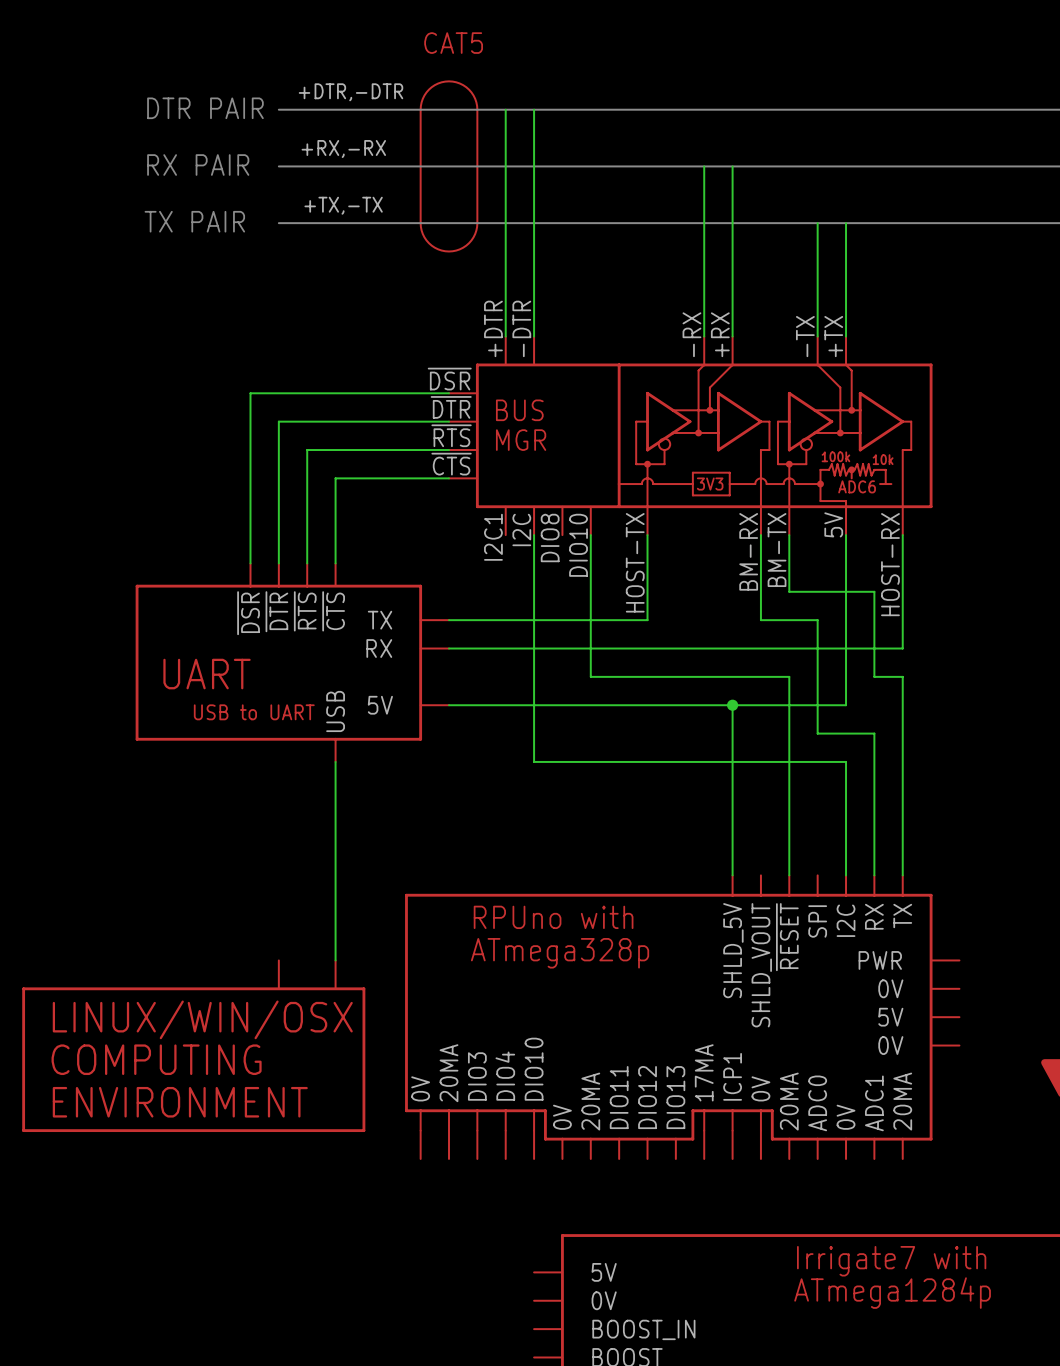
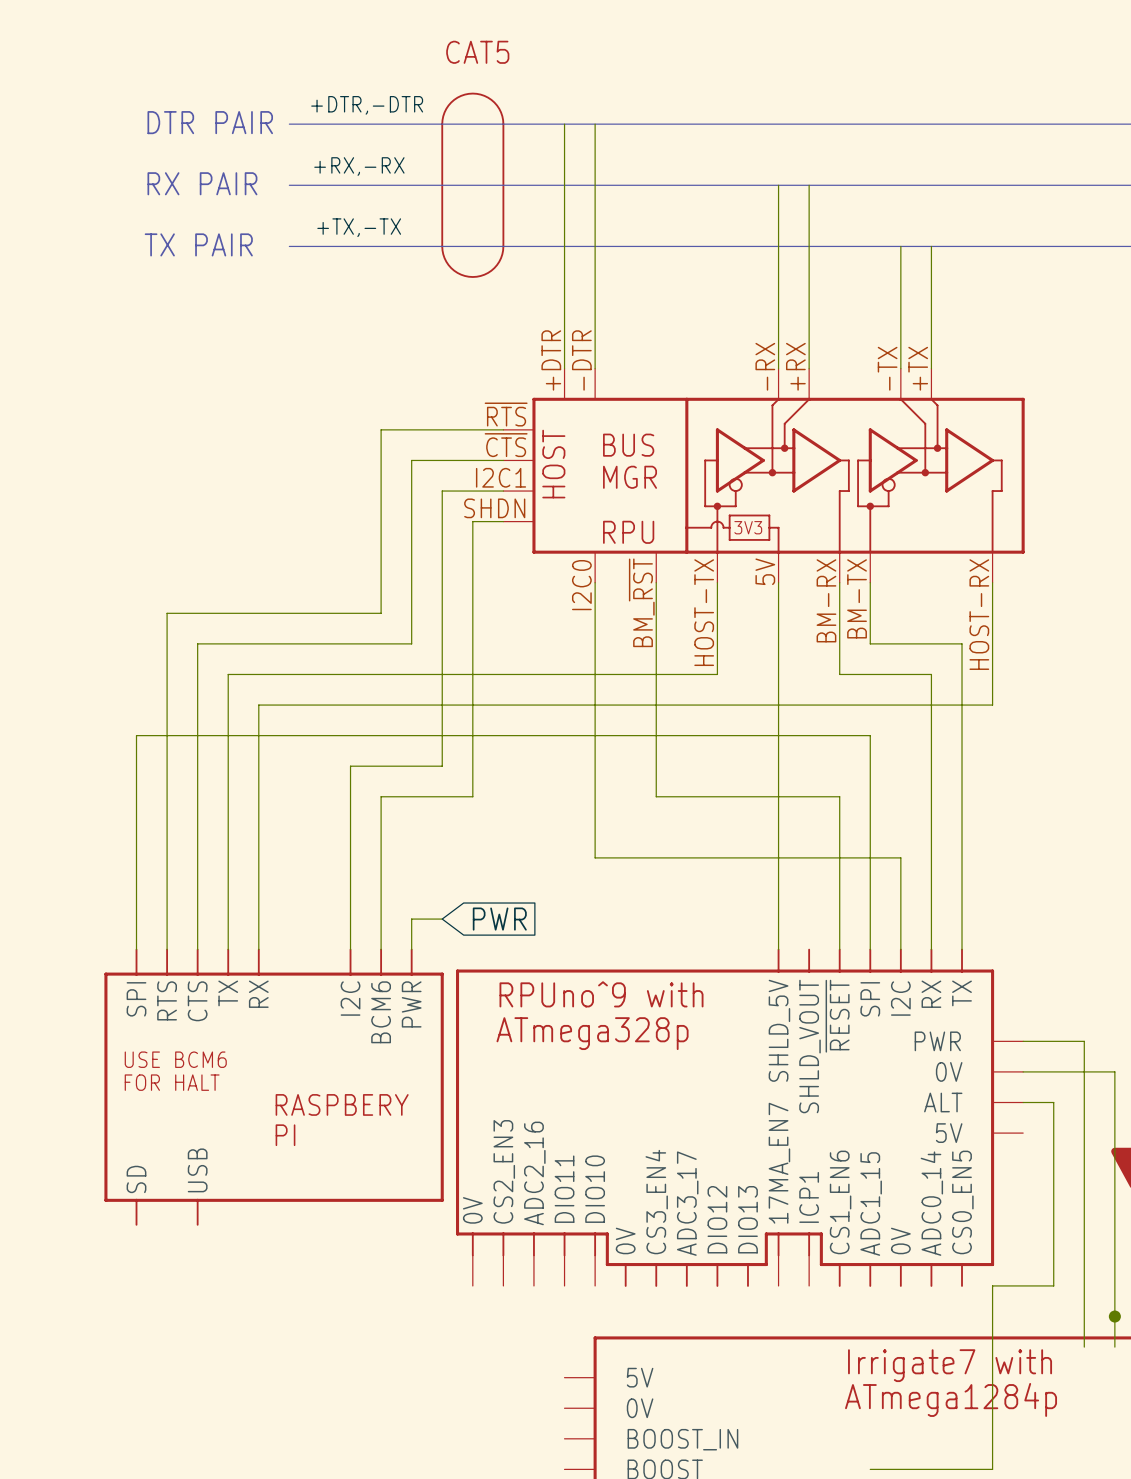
wire: (505, 109) (505, 336) -> (595, 124) (595, 368)
wire: (704, 166) (704, 336) -> (809, 185) (809, 368)
wire: (817, 223) (817, 336) -> (931, 246) (931, 368)
wire: (363, 393) (250, 393) (250, 563) -> (381, 429) (381, 613) (167, 613) (167, 949)
wire: (392, 421) (278, 421) (278, 563) -> (411, 460) (411, 643) (197, 643) (197, 949)
part: (690, 435) -> none
part: none -> (764, 475)
wire: (420, 450) (307, 450) (307, 563) -> (442, 491) (442, 766) (350, 766) (350, 827)
wire: (449, 478) (335, 478) (335, 563) -> none
wire: none -> (503, 521) (472, 521) (472, 796) (381, 796) (381, 949)
wire: (534, 535) (534, 761) (846, 761) (846, 790) -> (595, 582) (595, 857) (900, 857)
wire: (590, 535) (590, 676) -> (136, 949) (136, 735) (625, 735)
wire: (647, 535) (647, 620) -> (717, 582) (717, 674) (686, 674)
wire: none -> (778, 582) (778, 766)
wire: (760, 535) (760, 620) (789, 620) -> none
wire: (846, 535) (846, 705) (449, 705) -> none
wire: (902, 535) (902, 591) -> (870, 582) (870, 643)
wire: none -> (992, 582) (992, 705) (962, 705) (962, 735)
wire: (789, 591) (817, 591) -> (839, 643) (839, 674)
wire: (874, 591) (874, 620) -> (931, 643) (962, 643)
wire: none -> (472, 674) (228, 674) (228, 949)
wire: (817, 620) (817, 676) -> (839, 735) (870, 735)
wire: none -> (870, 674) (931, 674)
wire: none -> (472, 705) (258, 705) (258, 949)
part: (292, 662) -> none
wire: (789, 676) (789, 733) -> (656, 582) (656, 796) (839, 796)
wire: (874, 676) (902, 676) -> (931, 735) (931, 796)
junction: (732, 705) -> none
wire: (817, 733) (874, 733) -> (870, 796) (870, 949)
wire: none -> (442, 919) (411, 919) (411, 949)
global label: none -> PWR (499, 919)
wire: (335, 875) (335, 960) -> none
wire: none -> (1023, 1041) (1084, 1041) (1084, 1347)
wire: none -> (1023, 1071) (1114, 1071) (1114, 1347)
part: none -> (274, 1087)
part: (682, 1017) -> none
wire: none -> (1023, 1102) (1053, 1102) (1053, 1285) (992, 1285) (992, 1469) (870, 1469)
part: none -> (739, 1117)
part: (193, 1046) -> none
junction: none -> (1114, 1316)

